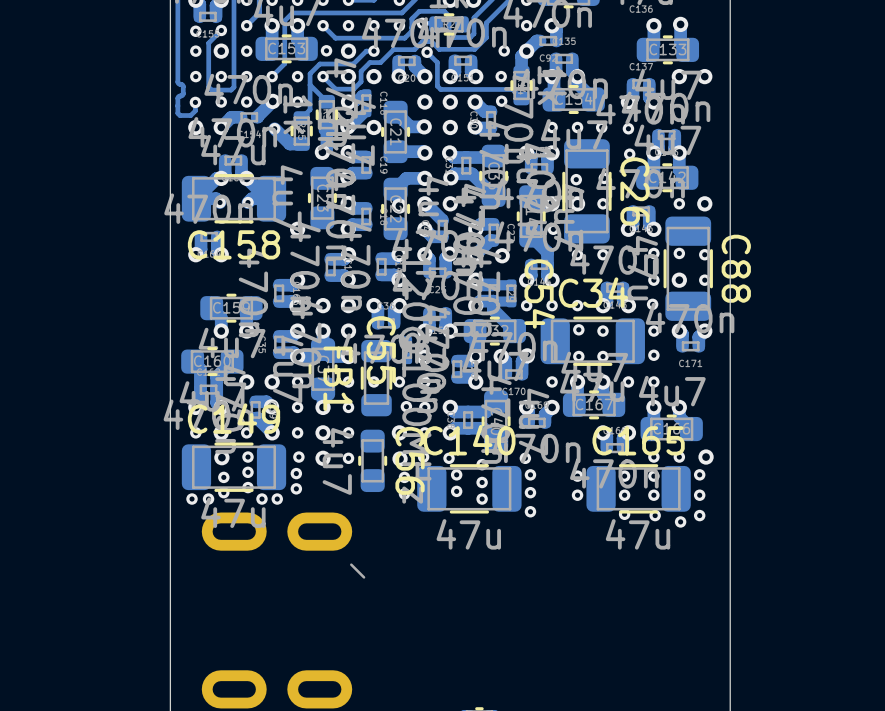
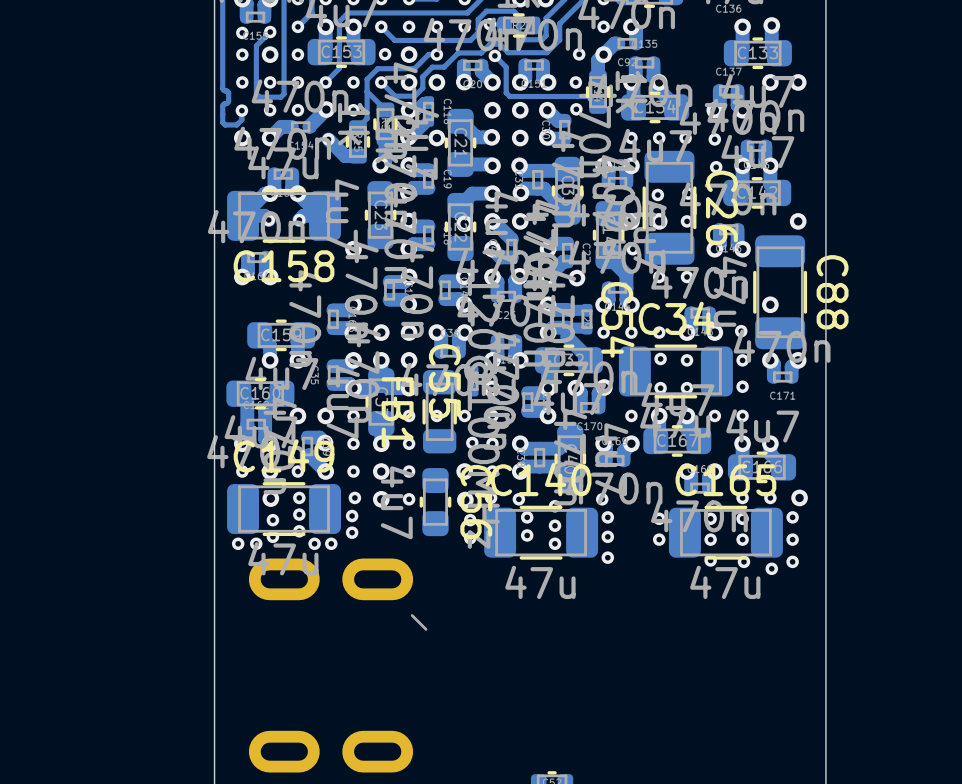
via: (679, 203) -> none
via: (653, 253) -> none
via: (679, 253) -> none
via: (704, 254) -> none
via: (653, 280) -> none
via: (704, 280) -> none

